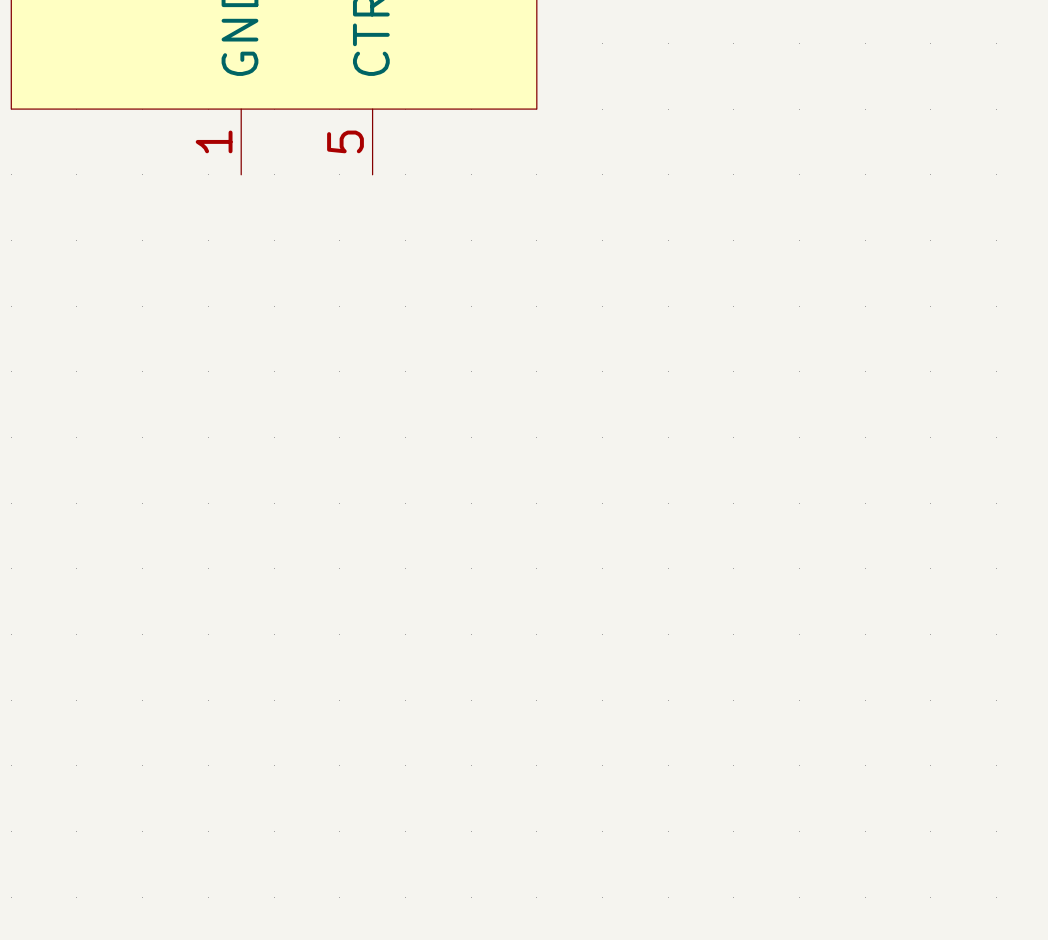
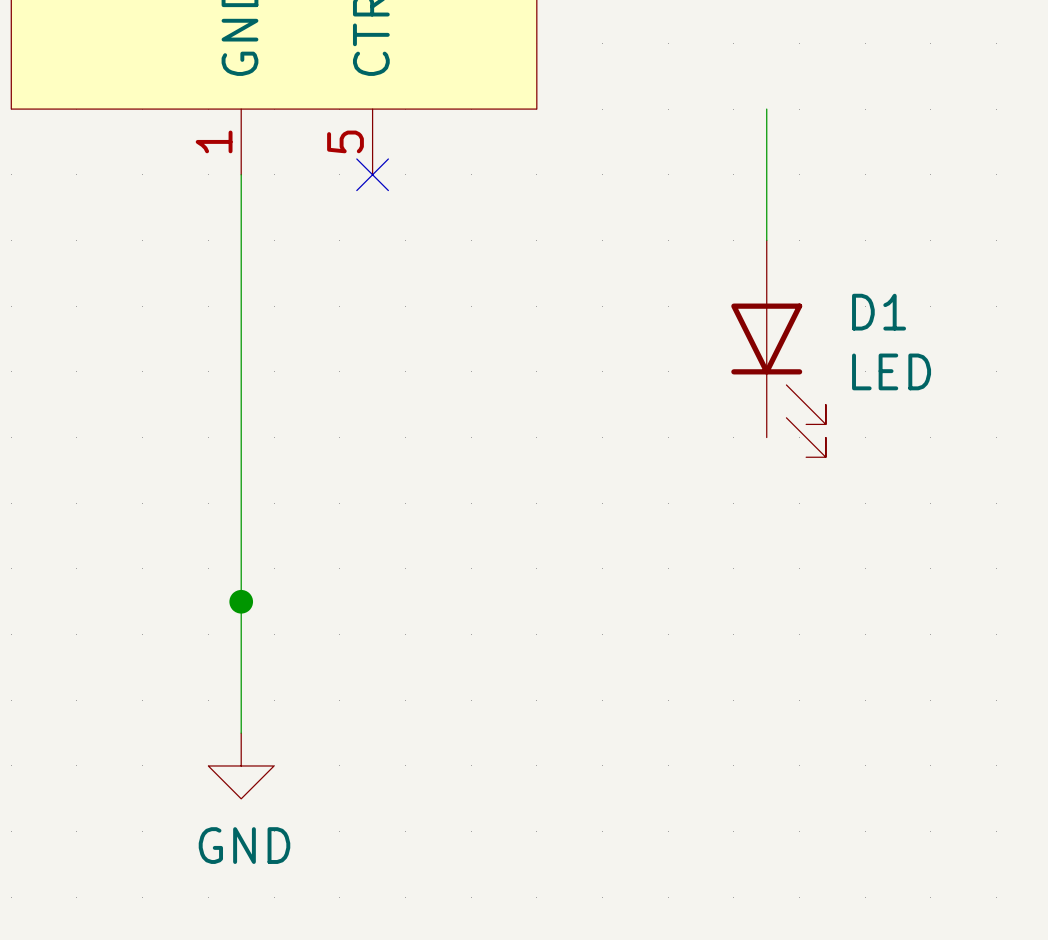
wire: none -> (766, 109) (766, 240)
wire: none -> (241, 174) (241, 733)
no-connect mark: none -> (372, 174)
D1: none -> LED (778, 348)
junction: none -> (241, 601)
power symbol: none -> GND (241, 765)

